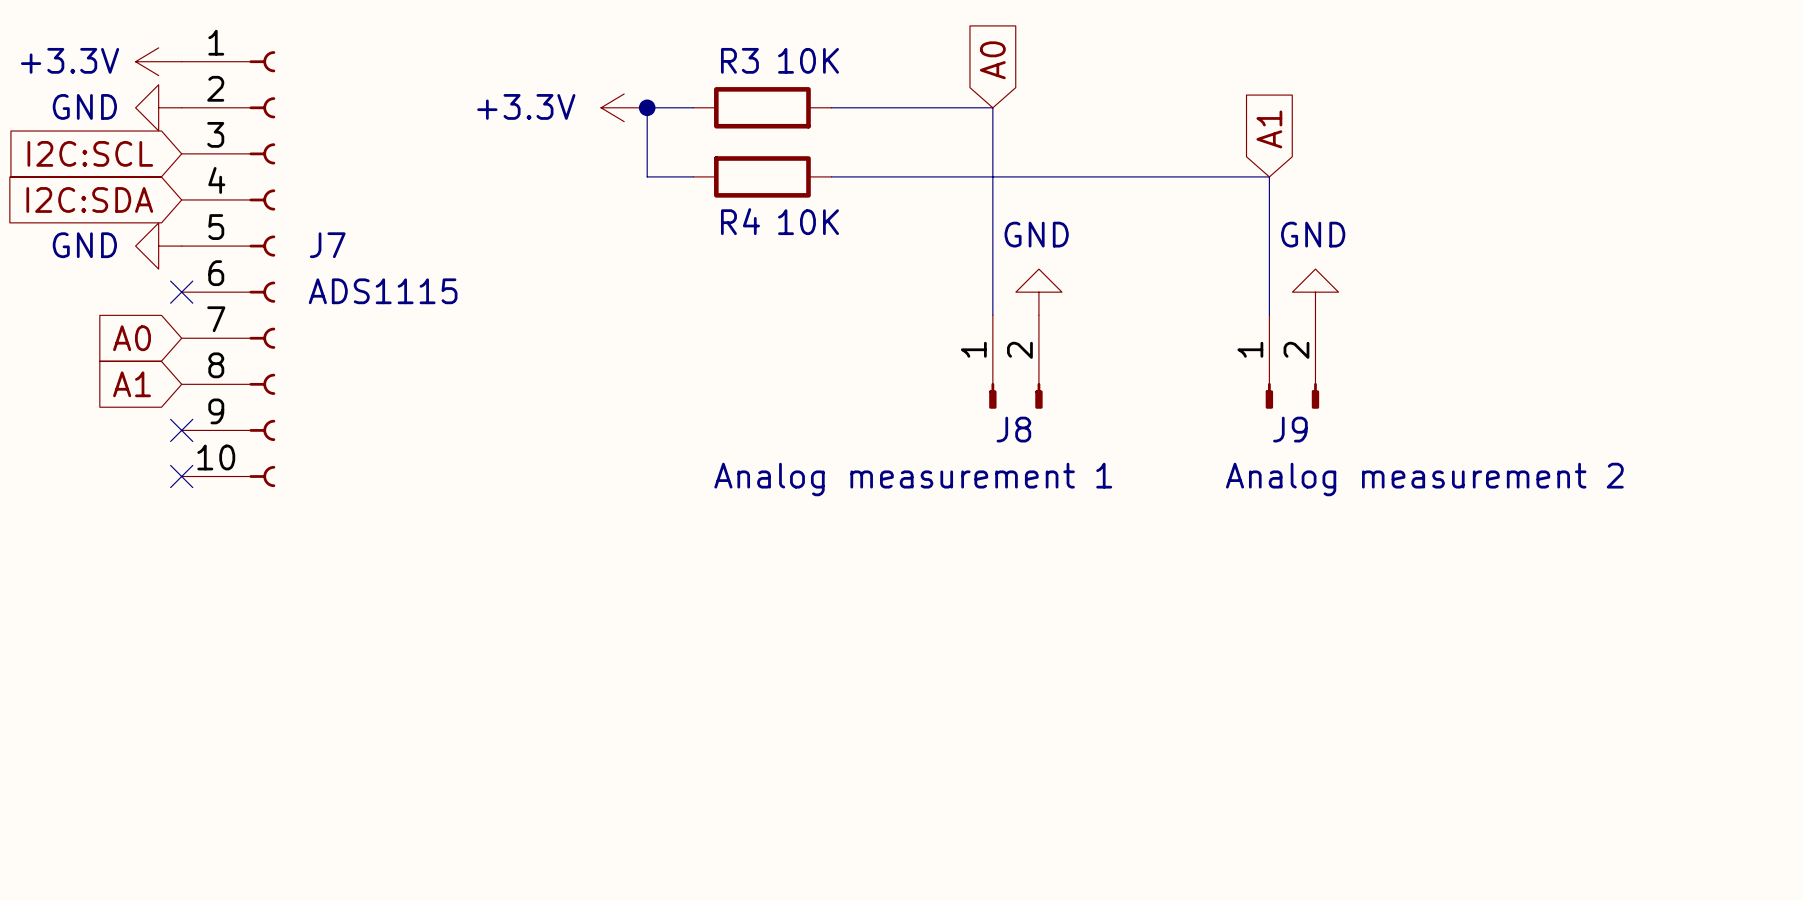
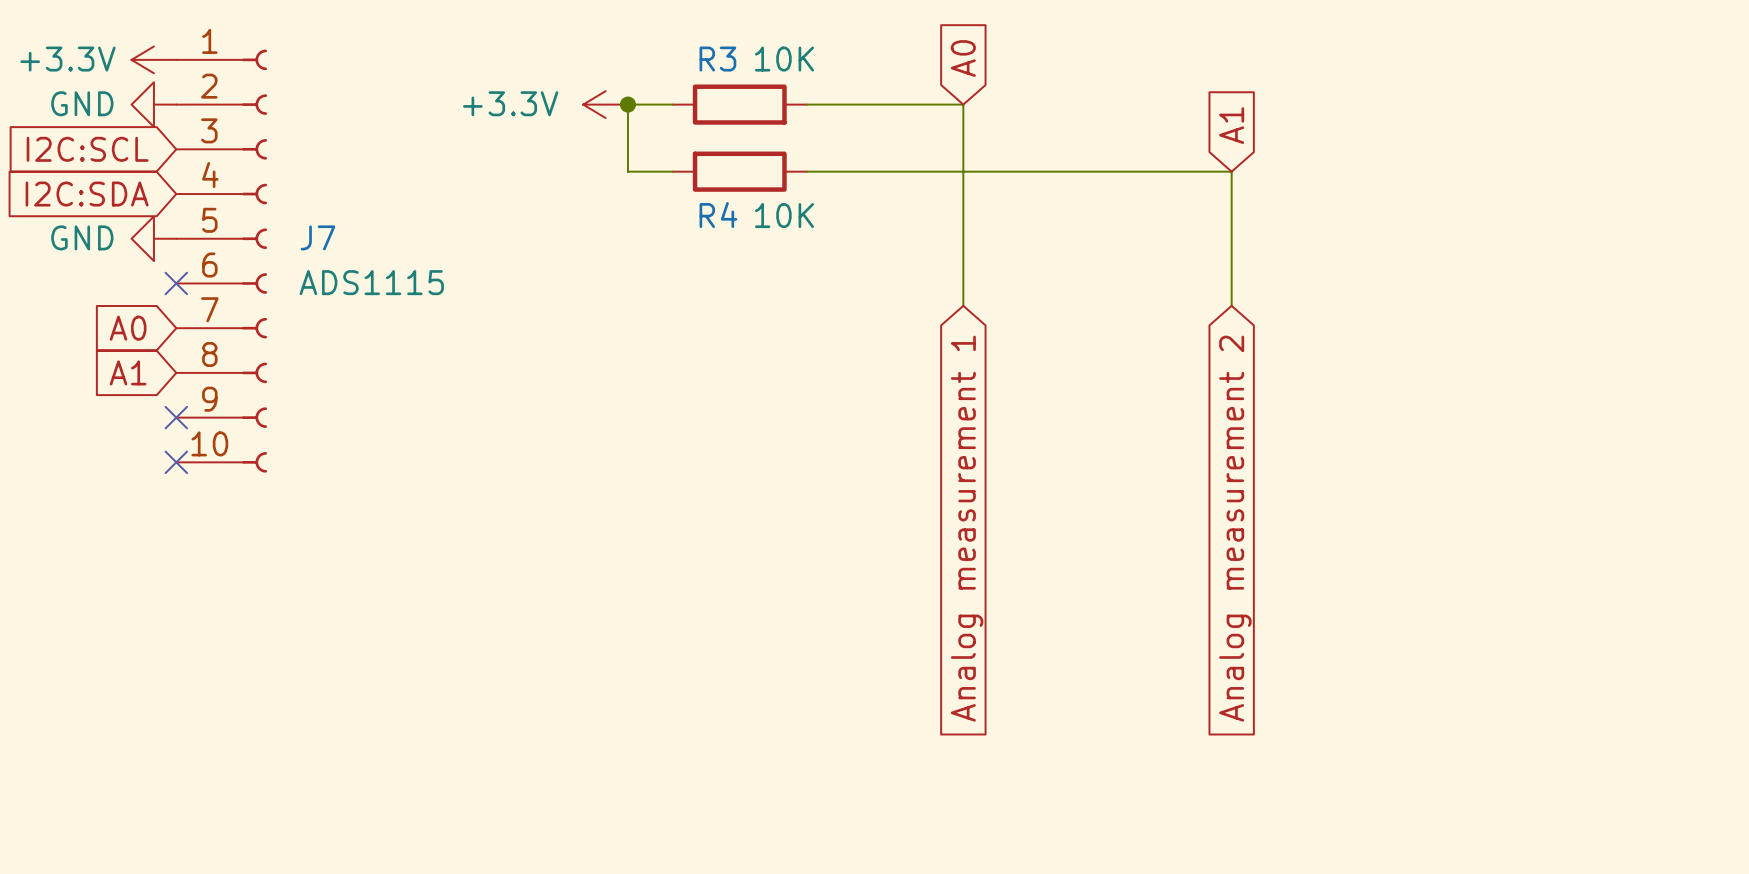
power symbol: GND (1038, 292) -> none
power symbol: GND (1315, 292) -> none
J8: Analog measurement 1 (1015, 361) -> none
J9: Analog measurement 2 (1292, 361) -> none
global label: none -> Analog measurement 1 (967, 528)
global label: none -> Analog measurement 2 (1235, 528)

